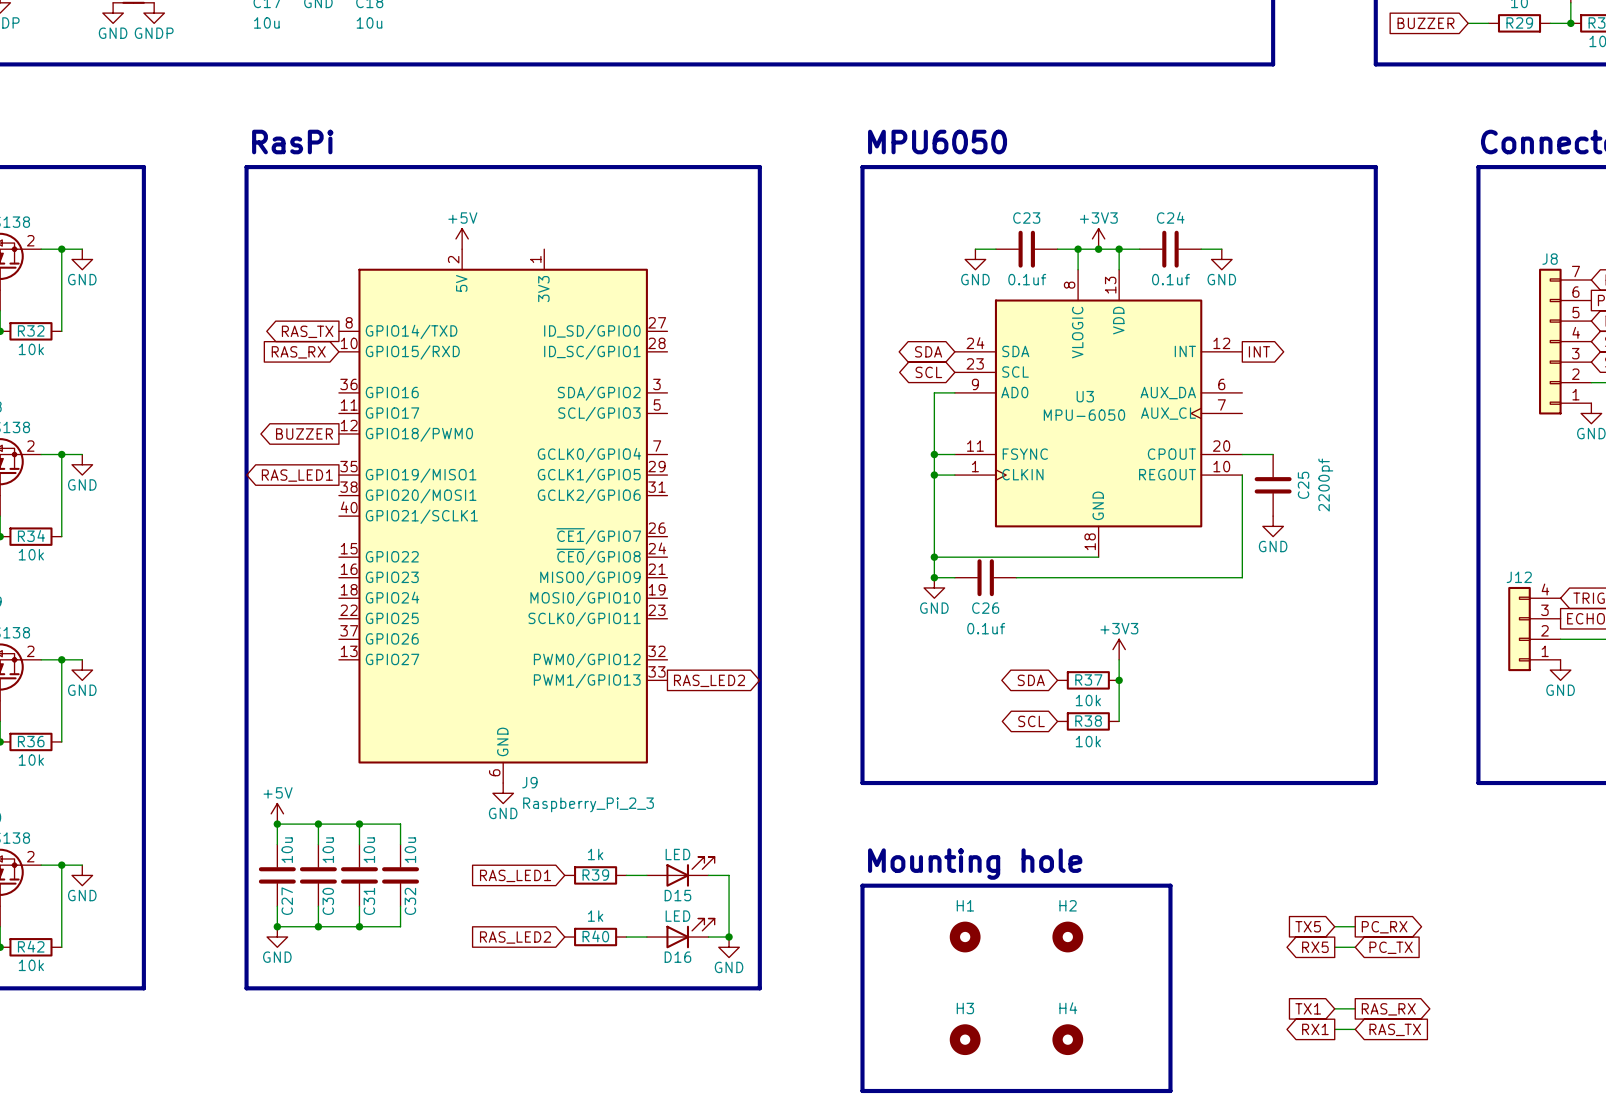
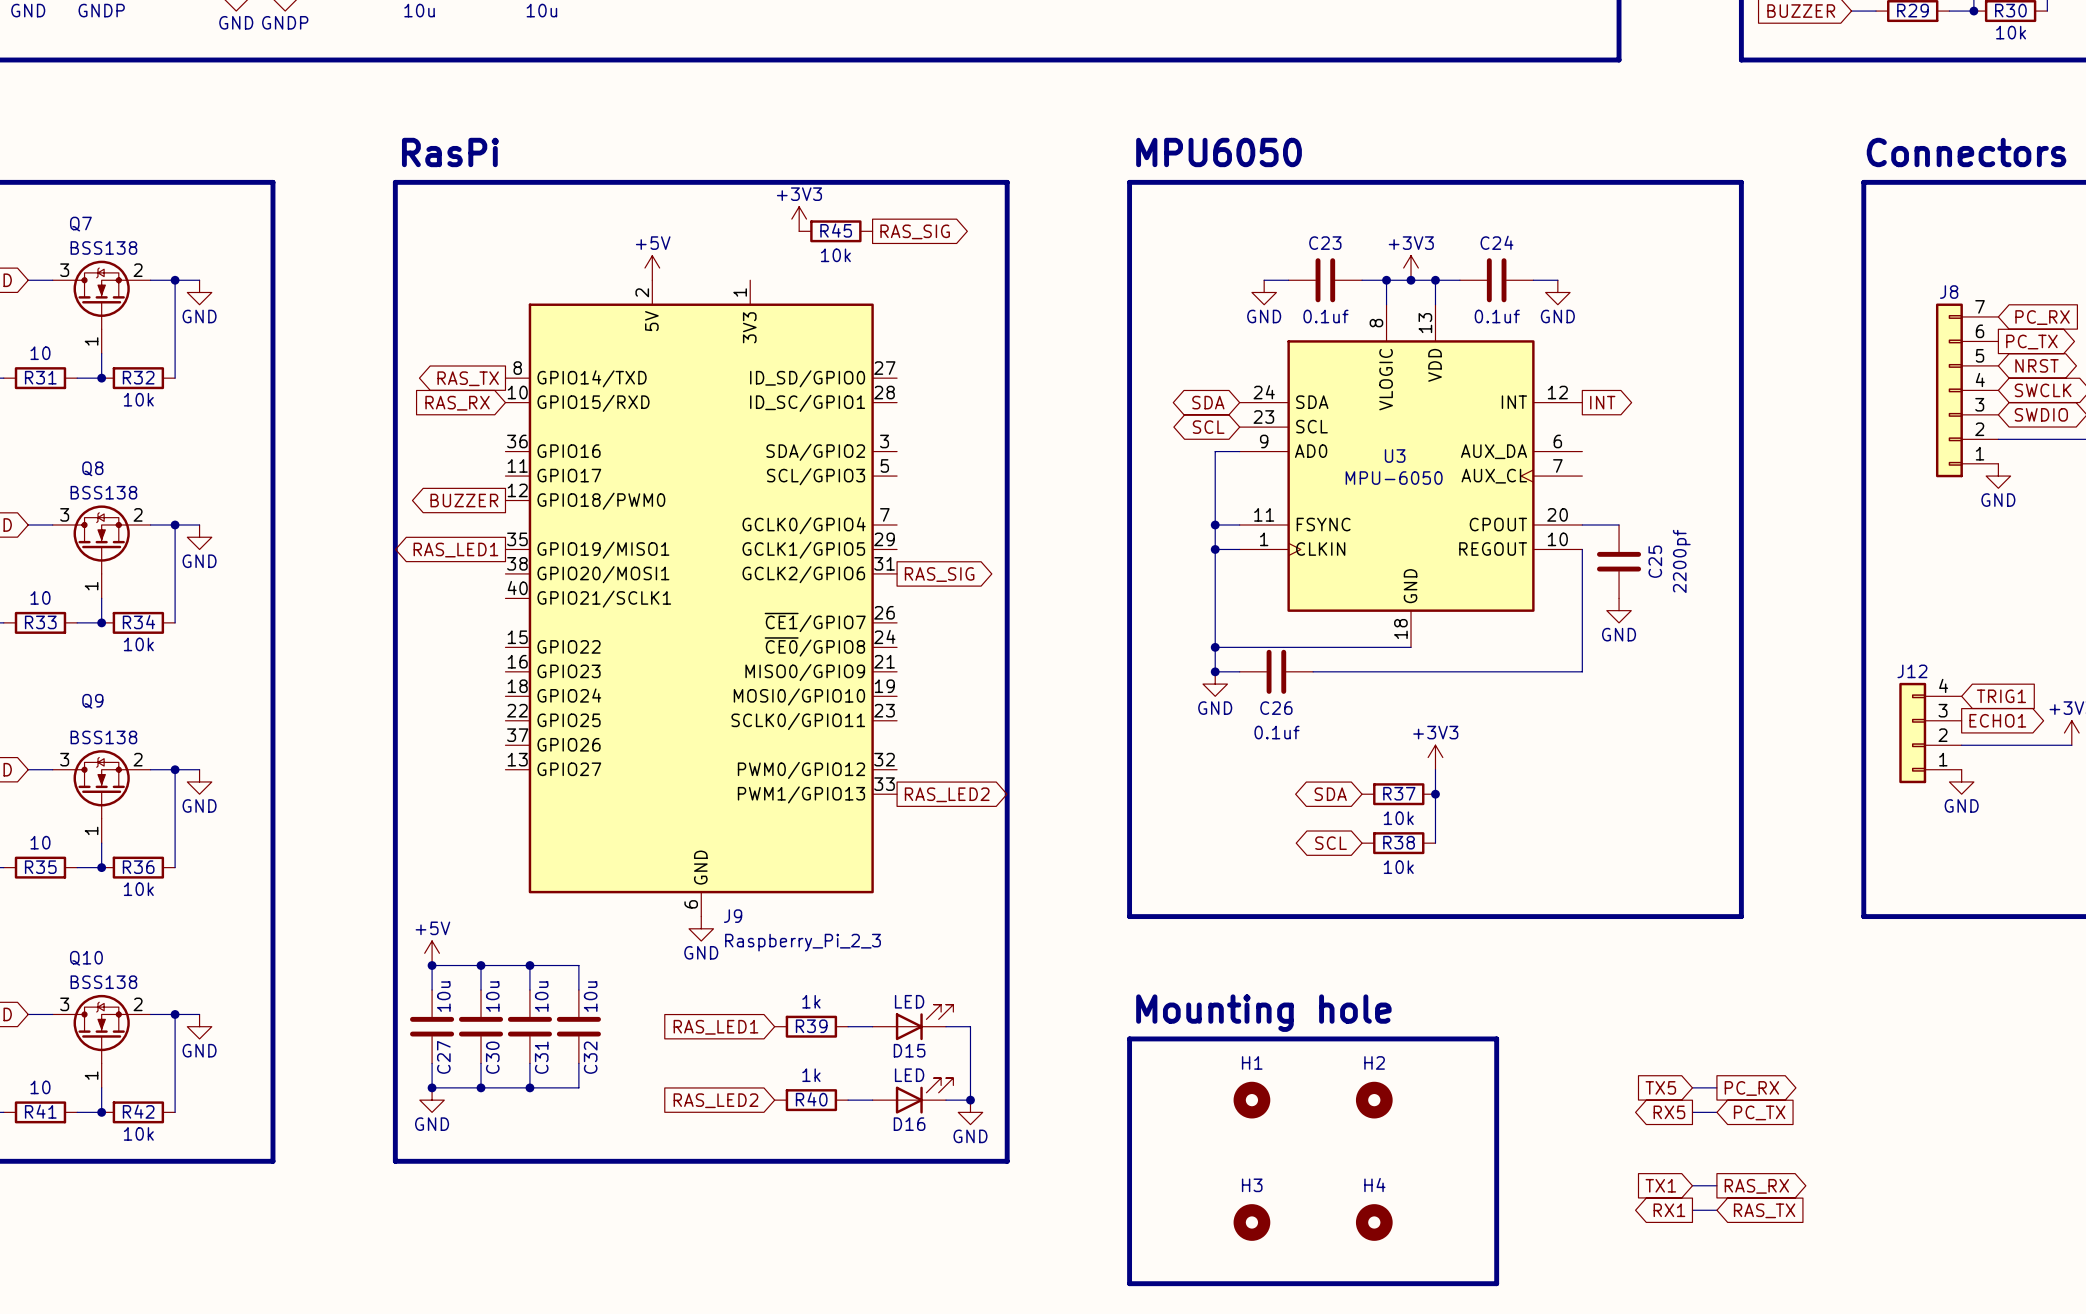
power symbol: none -> +3V3 (799, 219)
R45: none -> 10k (835, 231)
global label: none -> RAS_SIG (915, 231)
global label: none -> RAS_SIG (939, 574)

